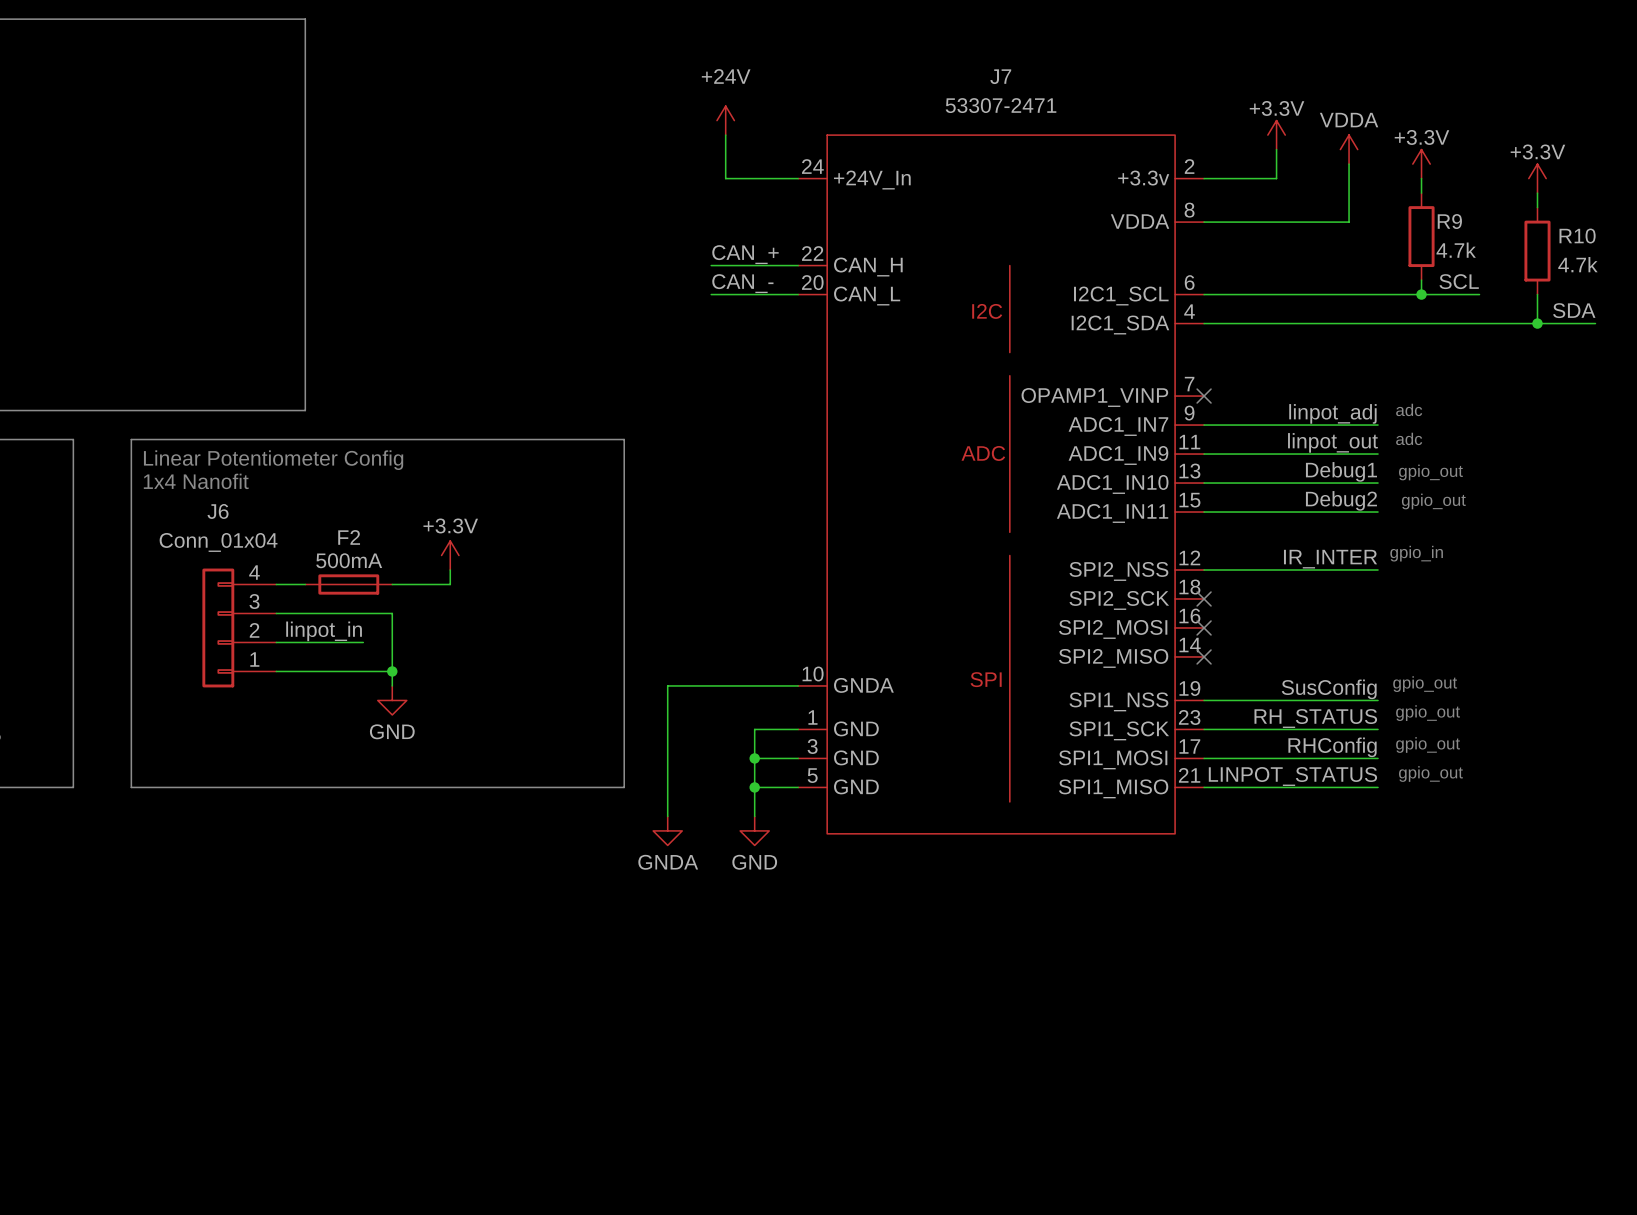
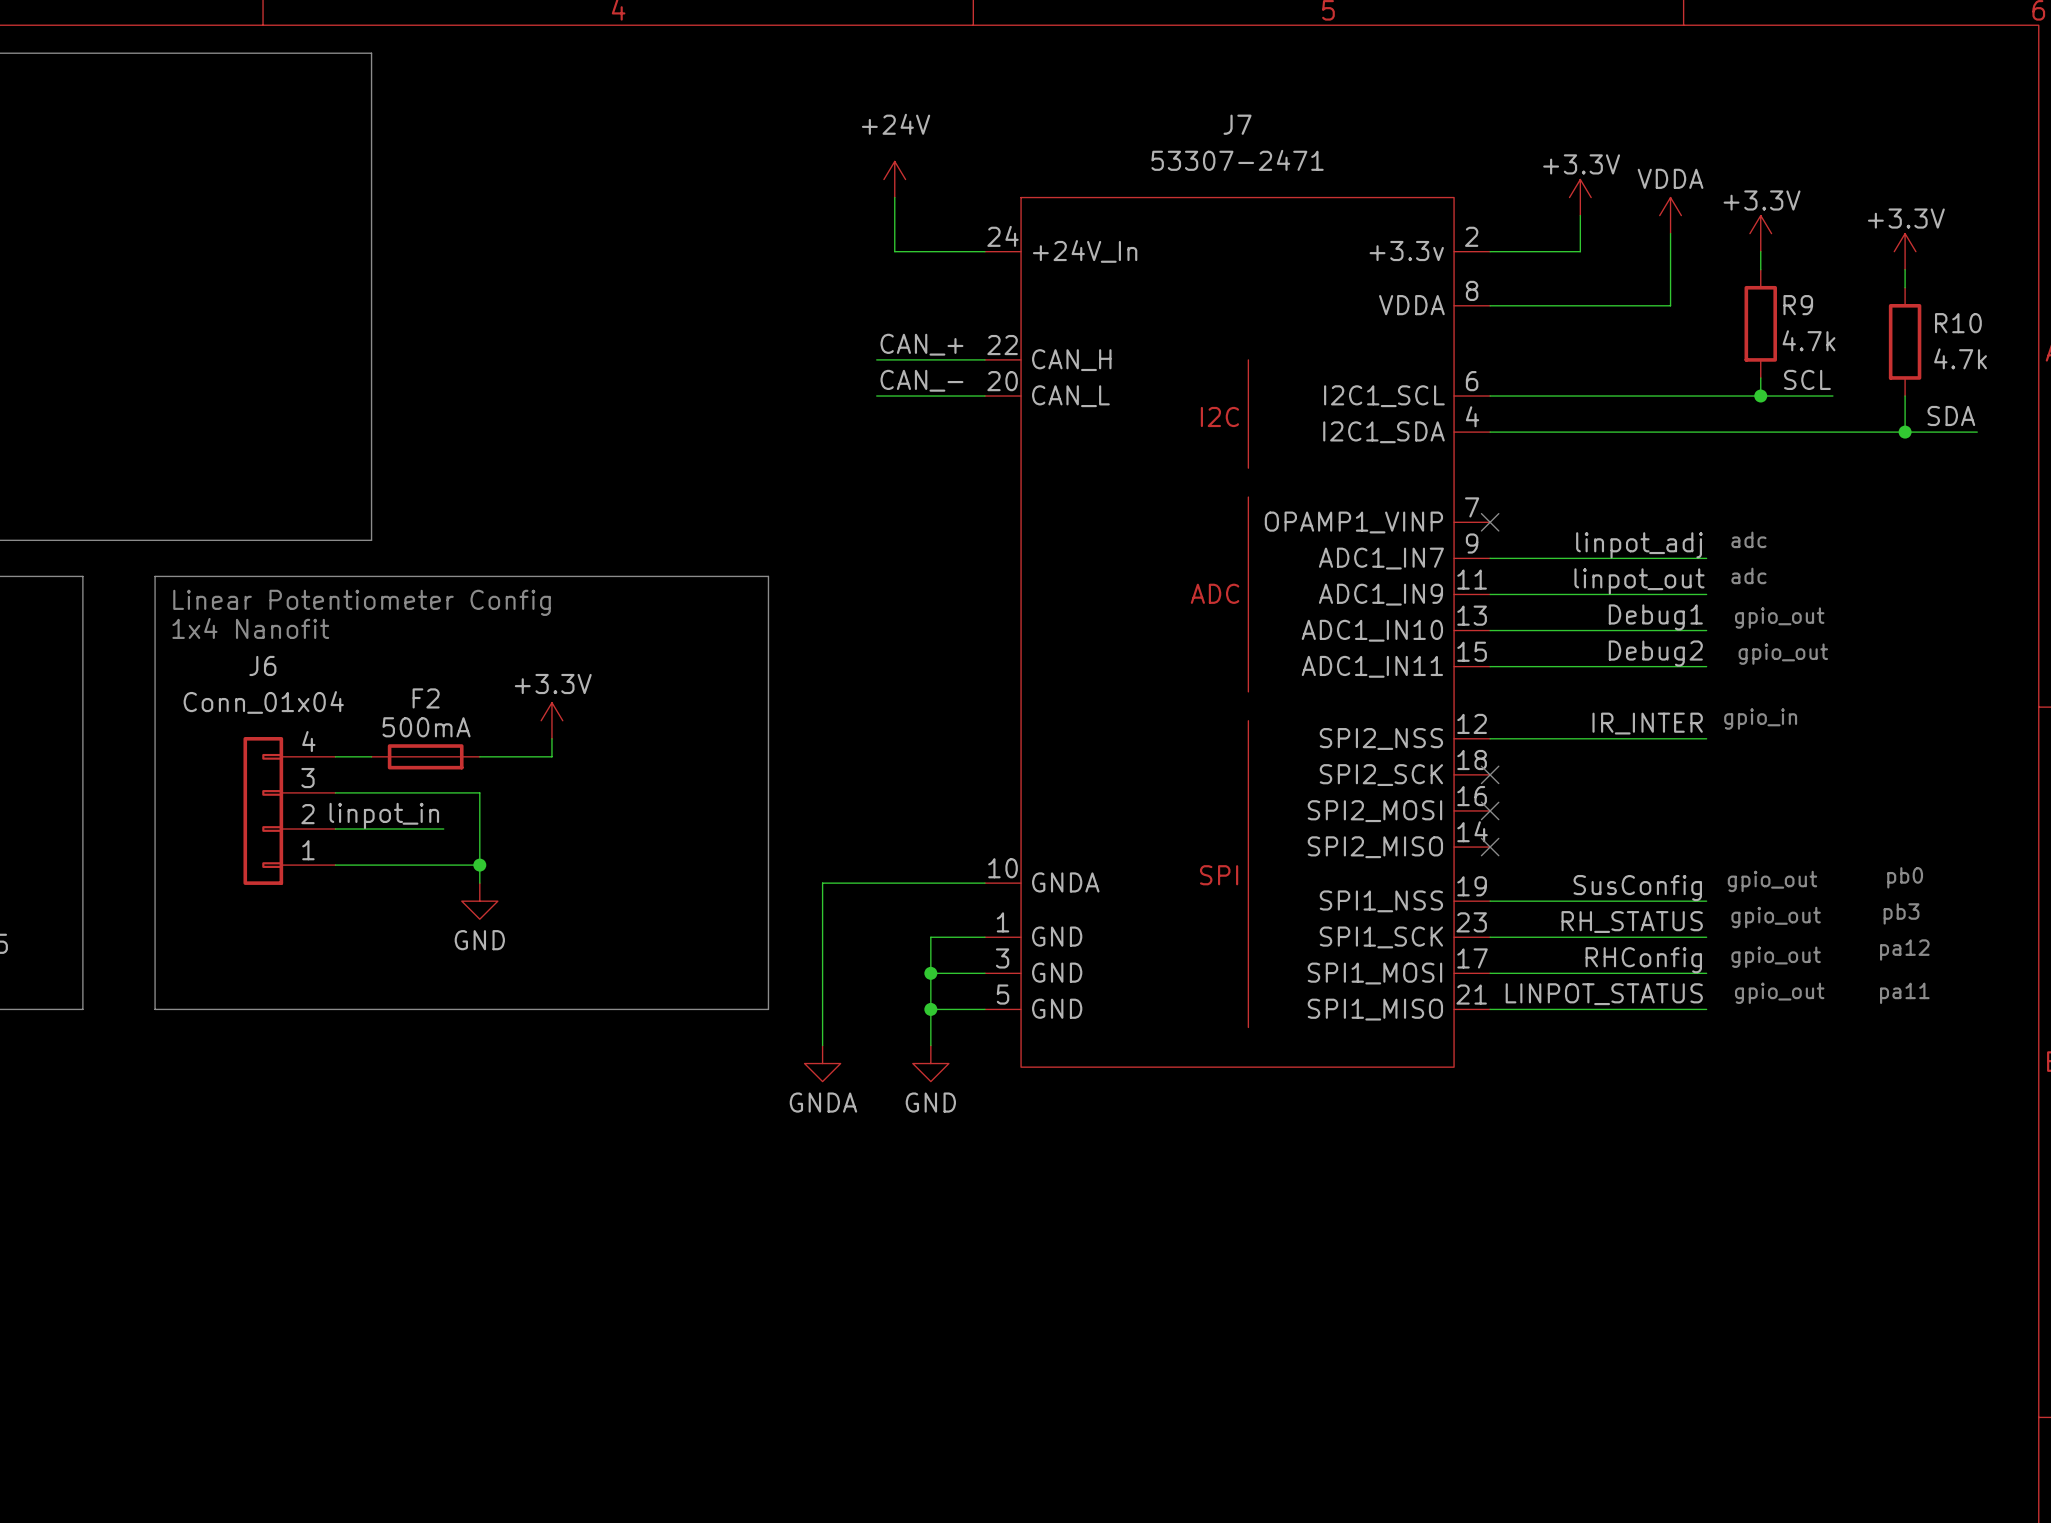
text: none -> pb0 (1905, 877)
text: none -> pb3 (1901, 913)
text: none -> pa12 (1904, 950)
text: none -> pa11 (1904, 993)

